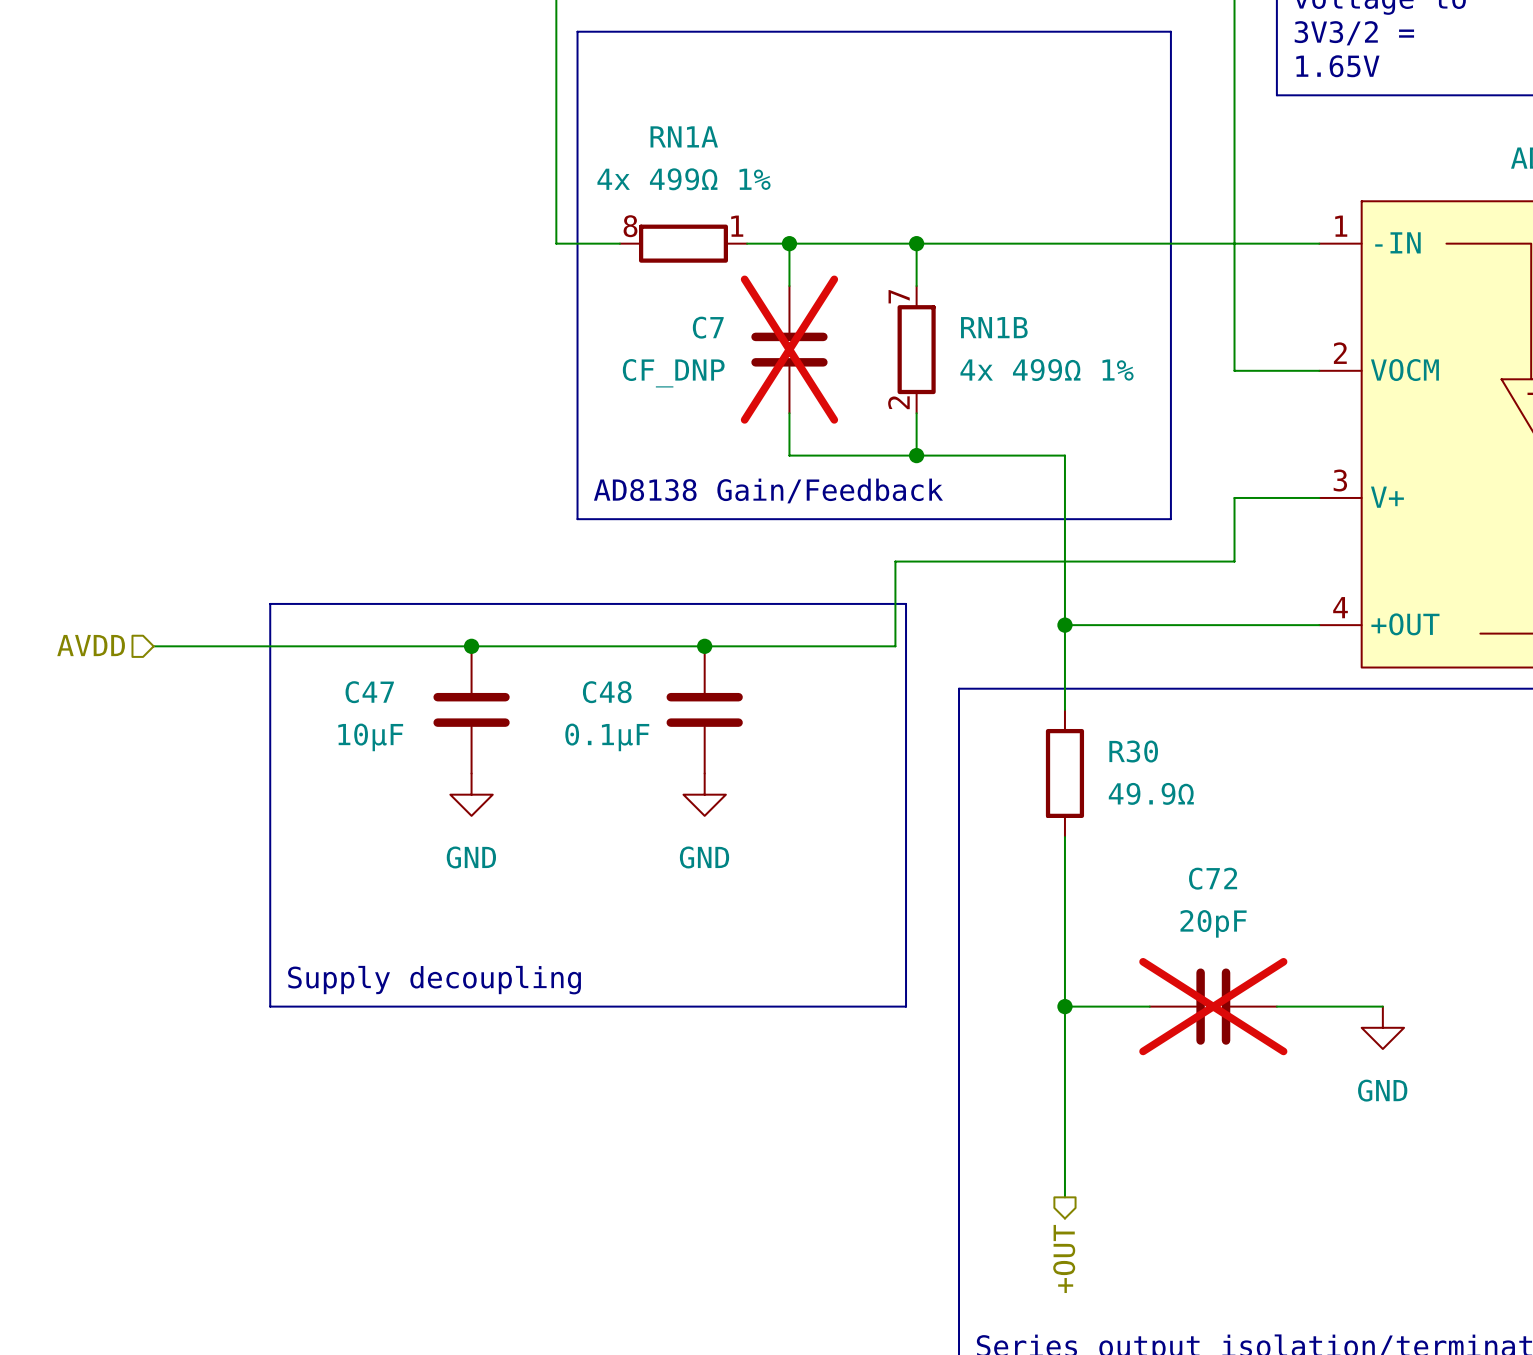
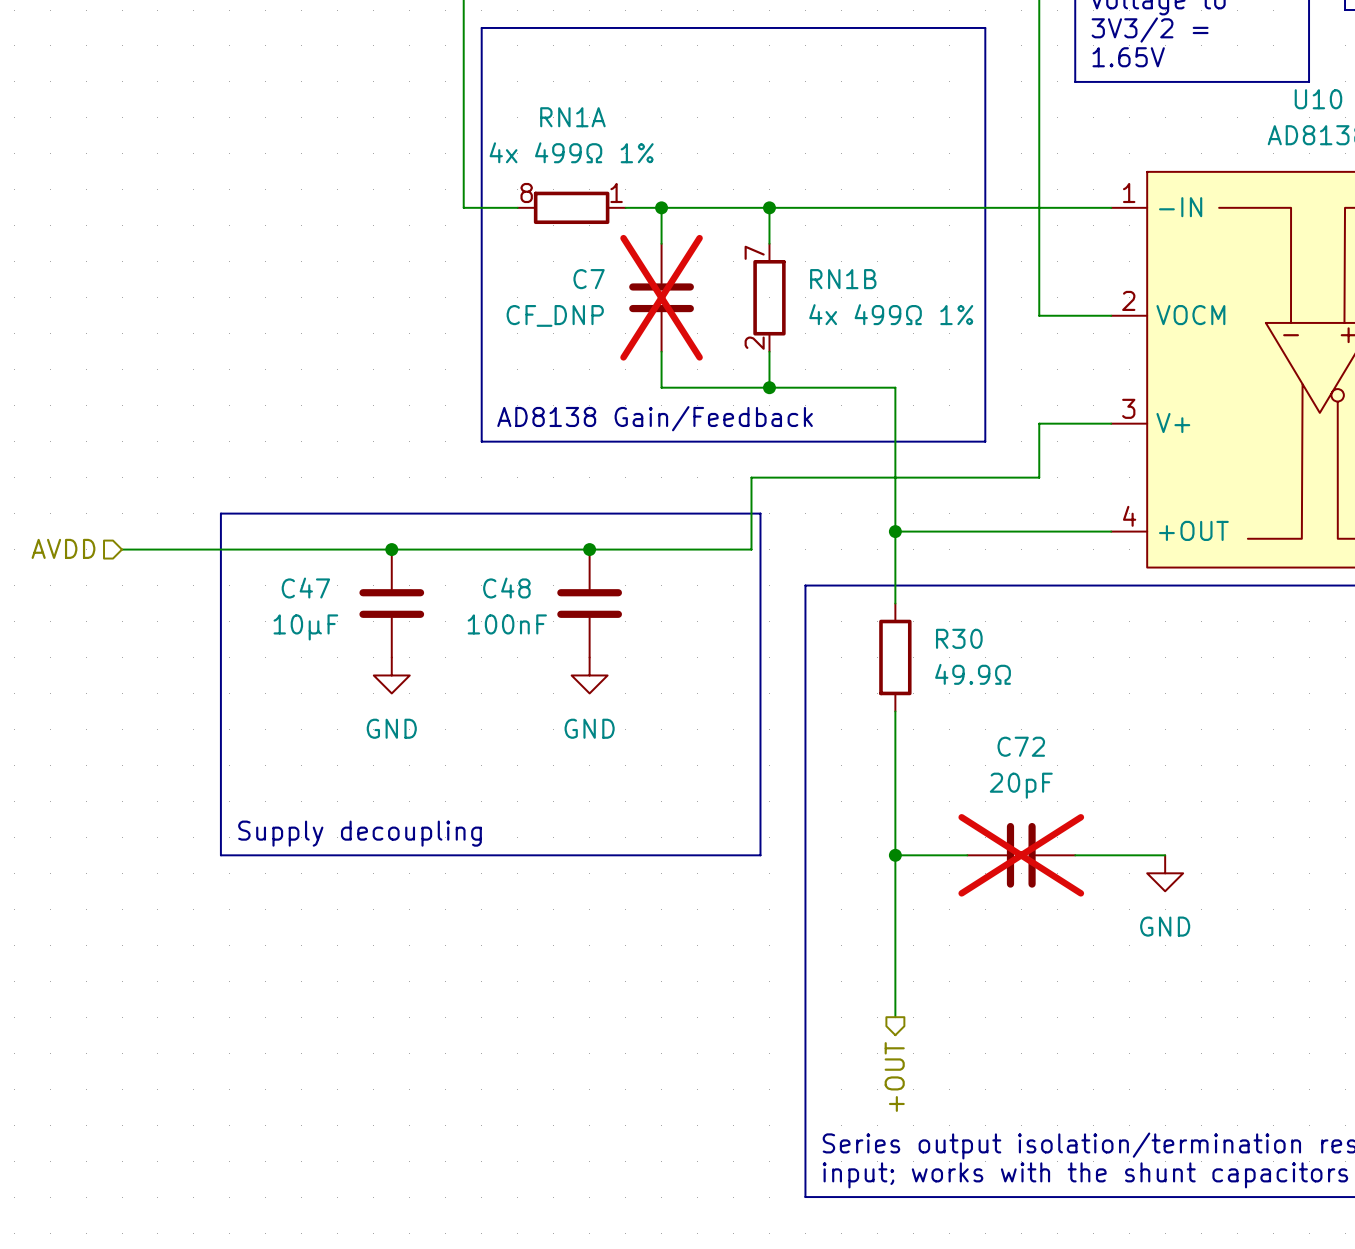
C48 value: 0.1µF (607, 737) -> 100nF (507, 624)

